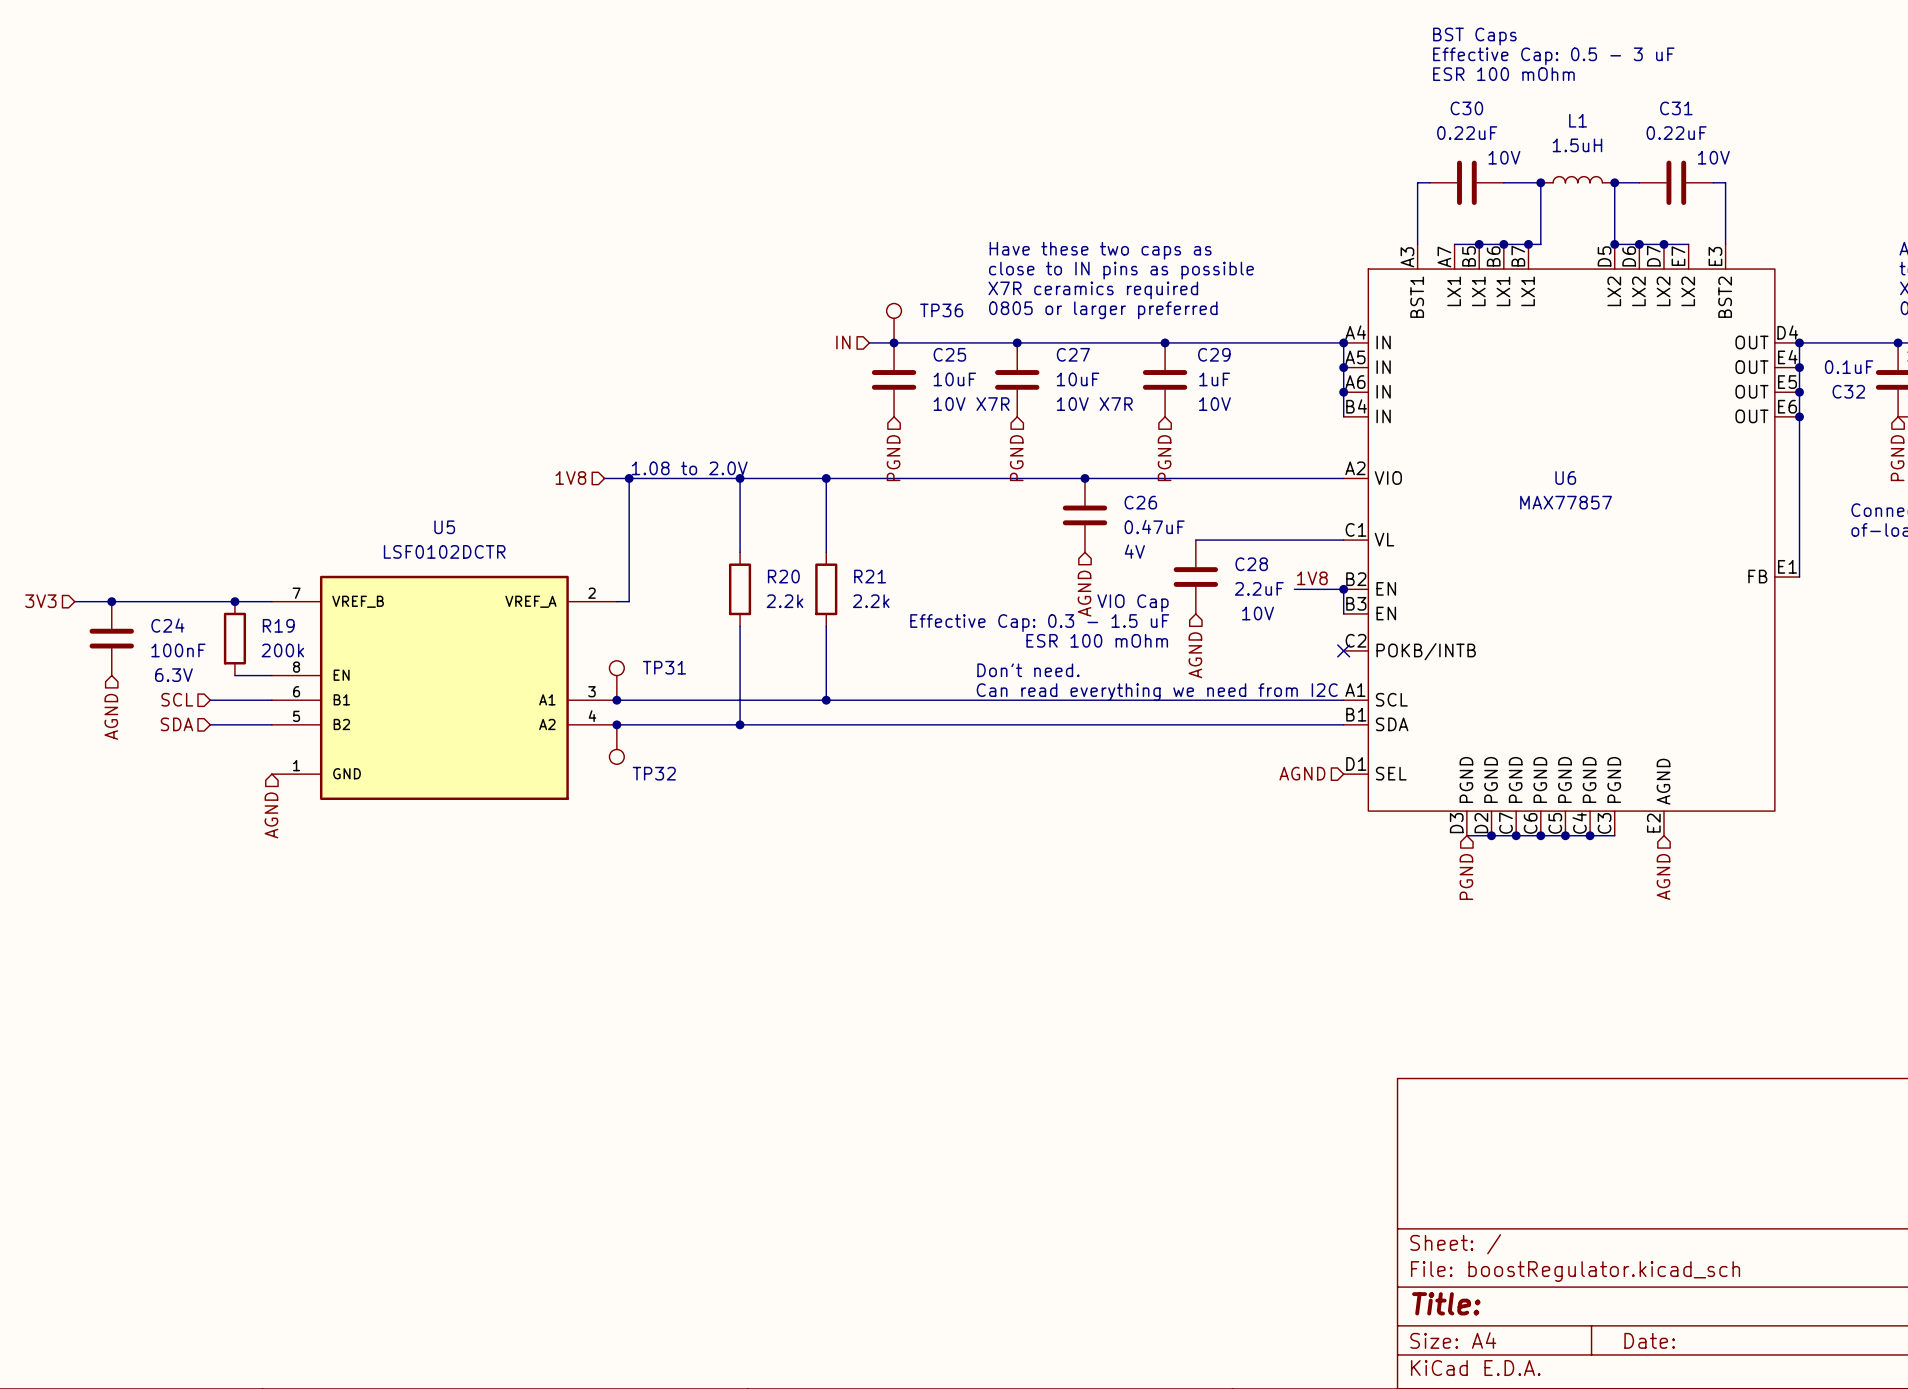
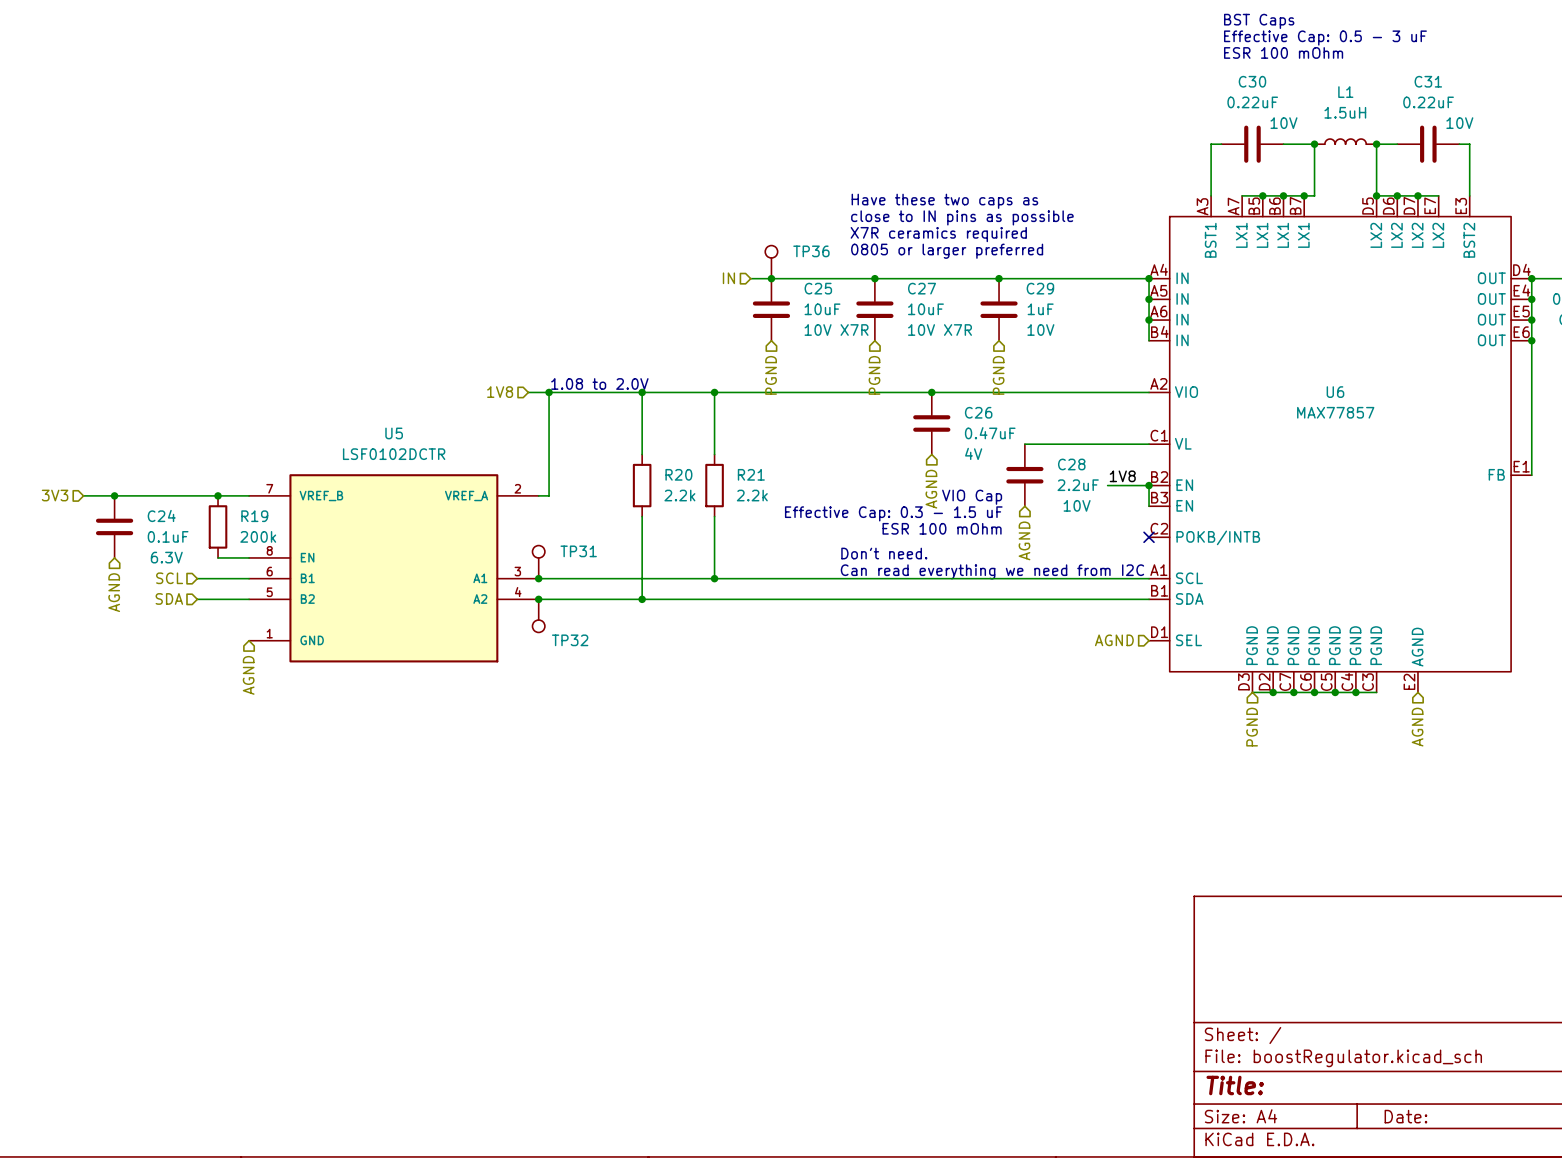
C24 value: 100nF (178, 650) -> 0.1uF (168, 536)

